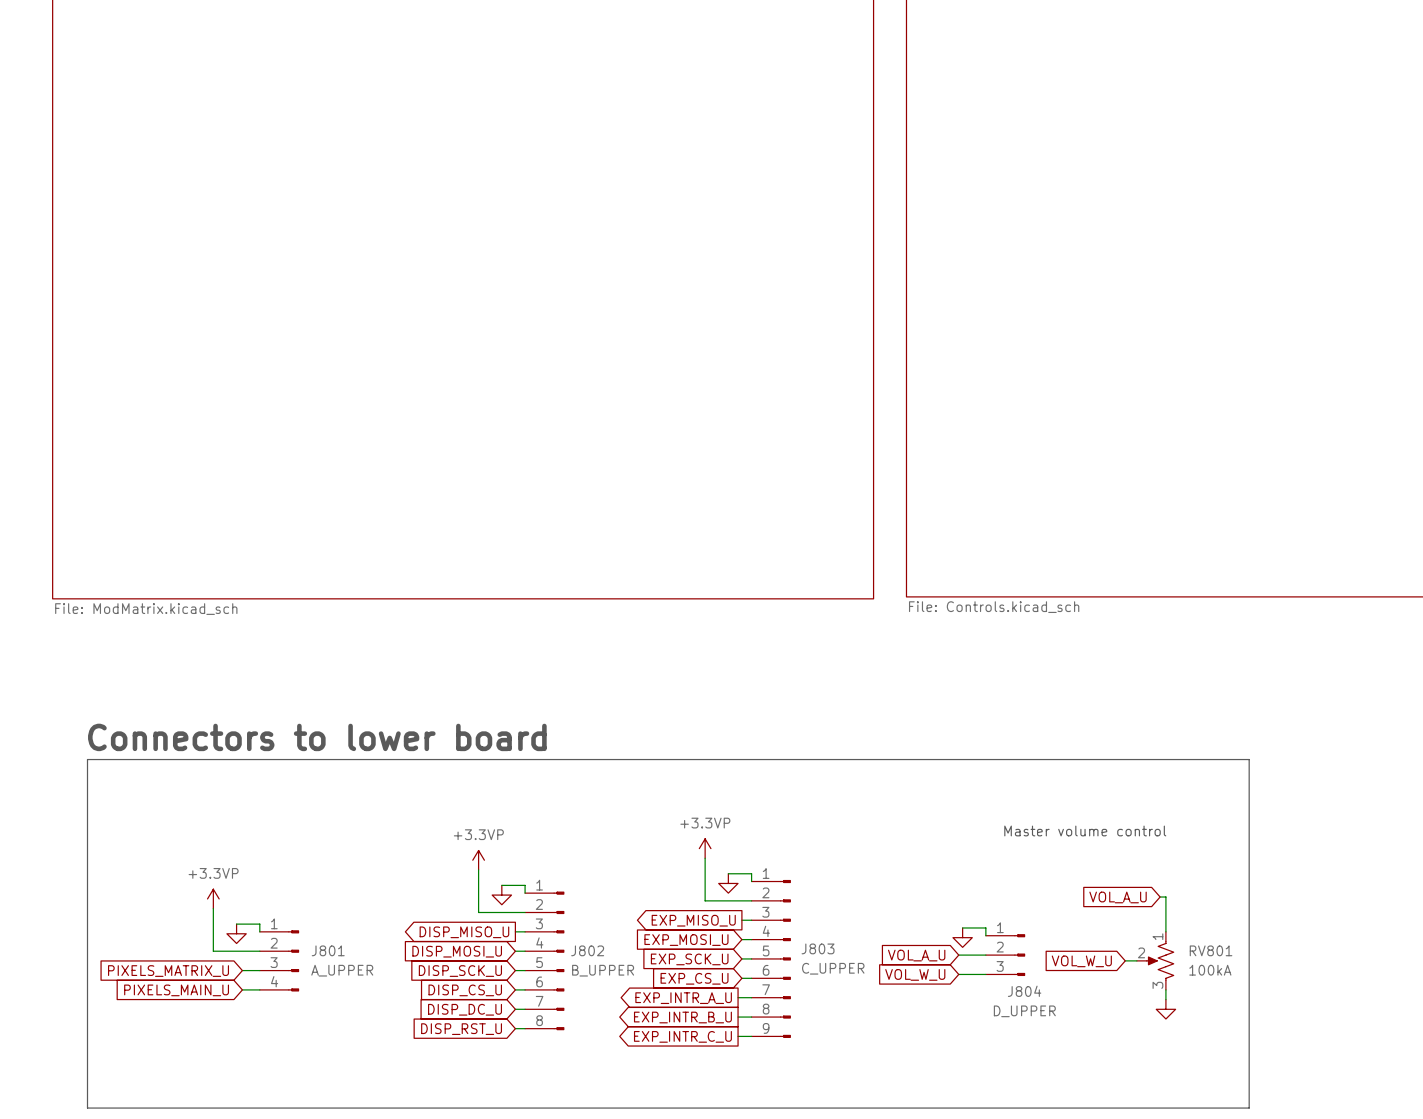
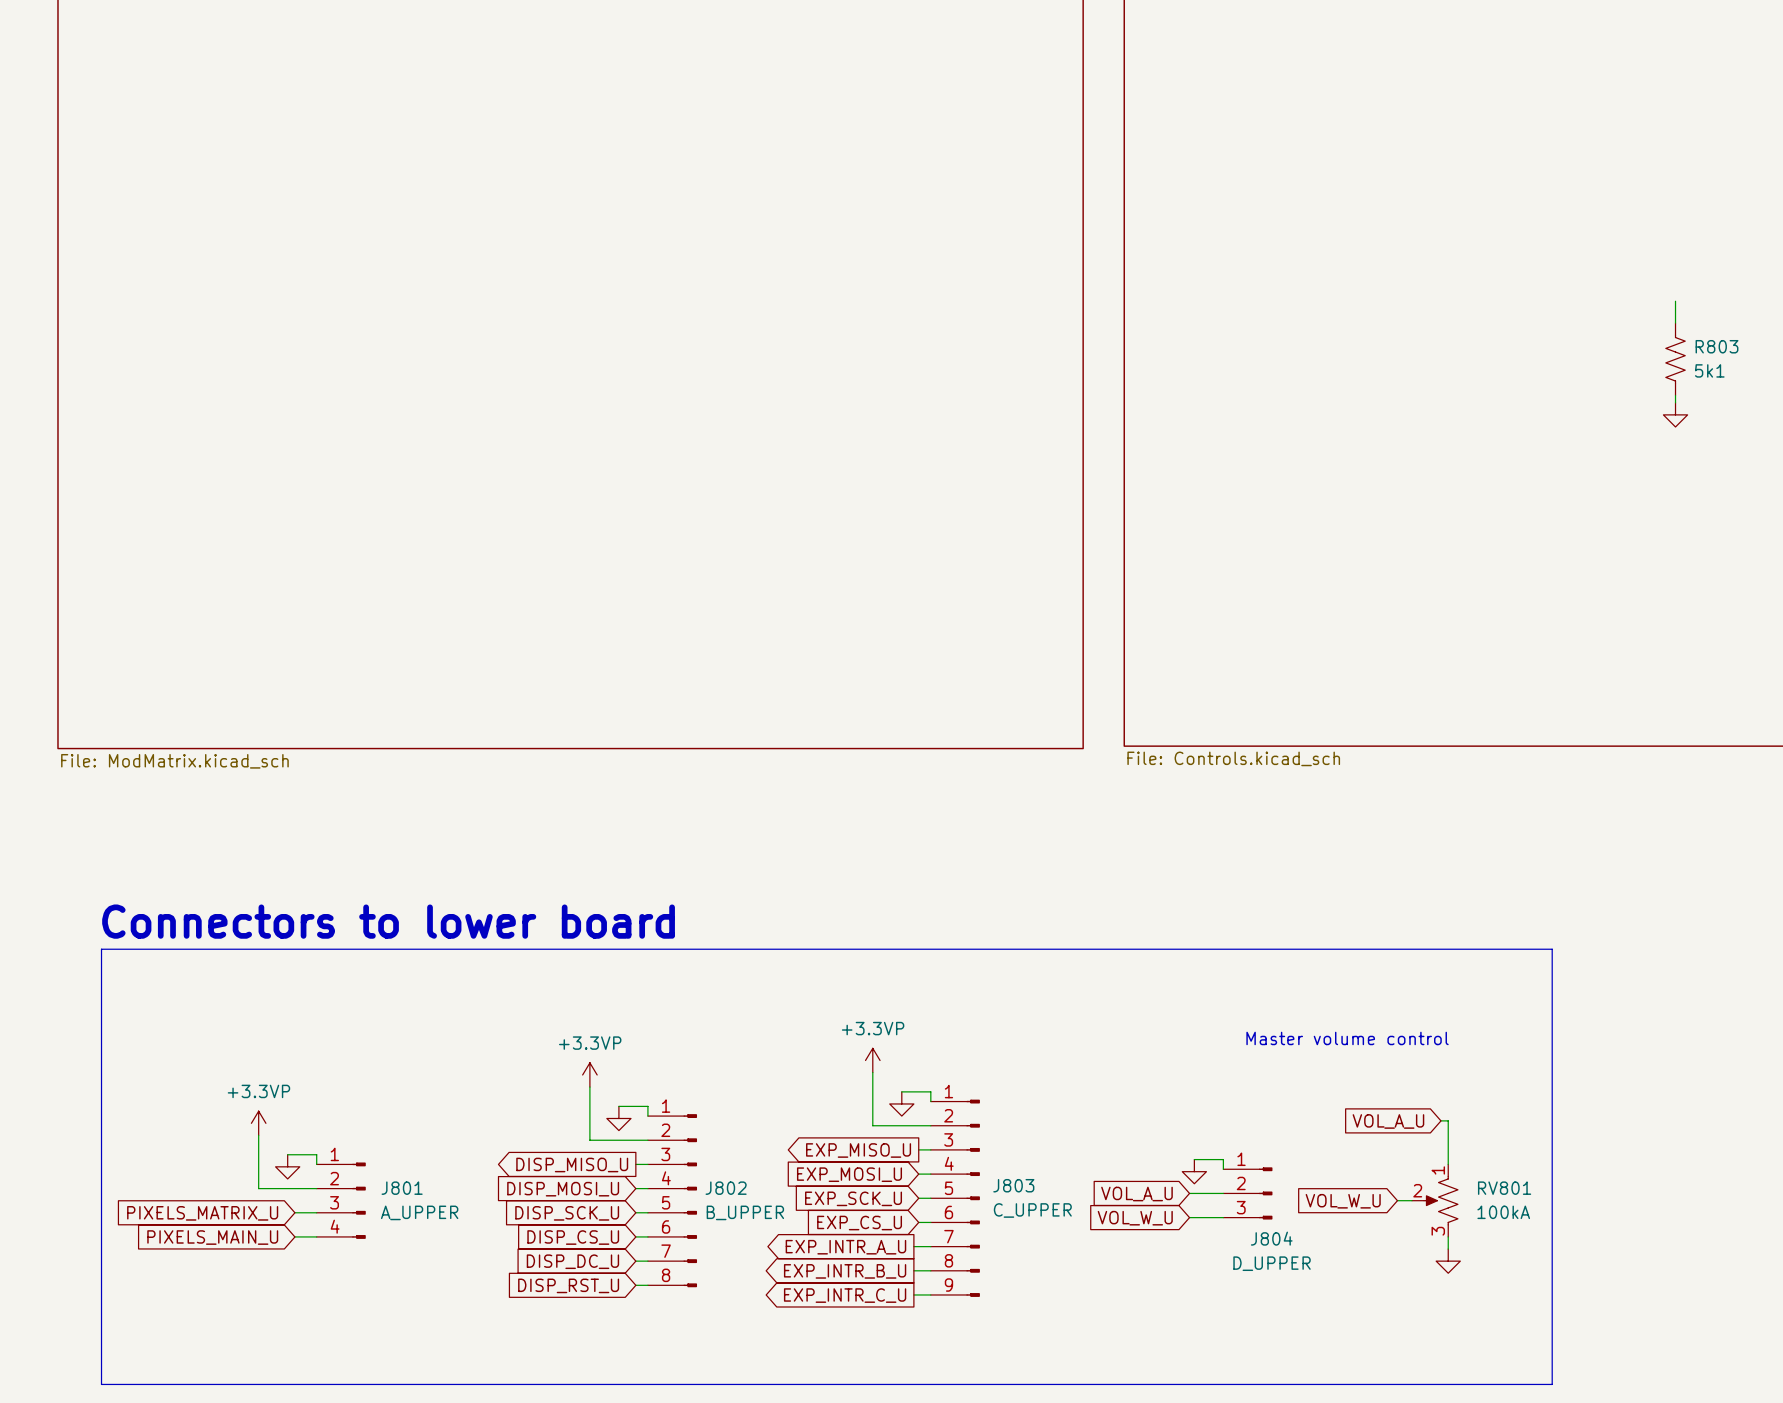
wire: none -> (1675, 301) (1675, 323)
R803: none -> 5k1 (1675, 359)
wire: none -> (1675, 395) (1675, 402)
power symbol: none -> (1675, 414)

